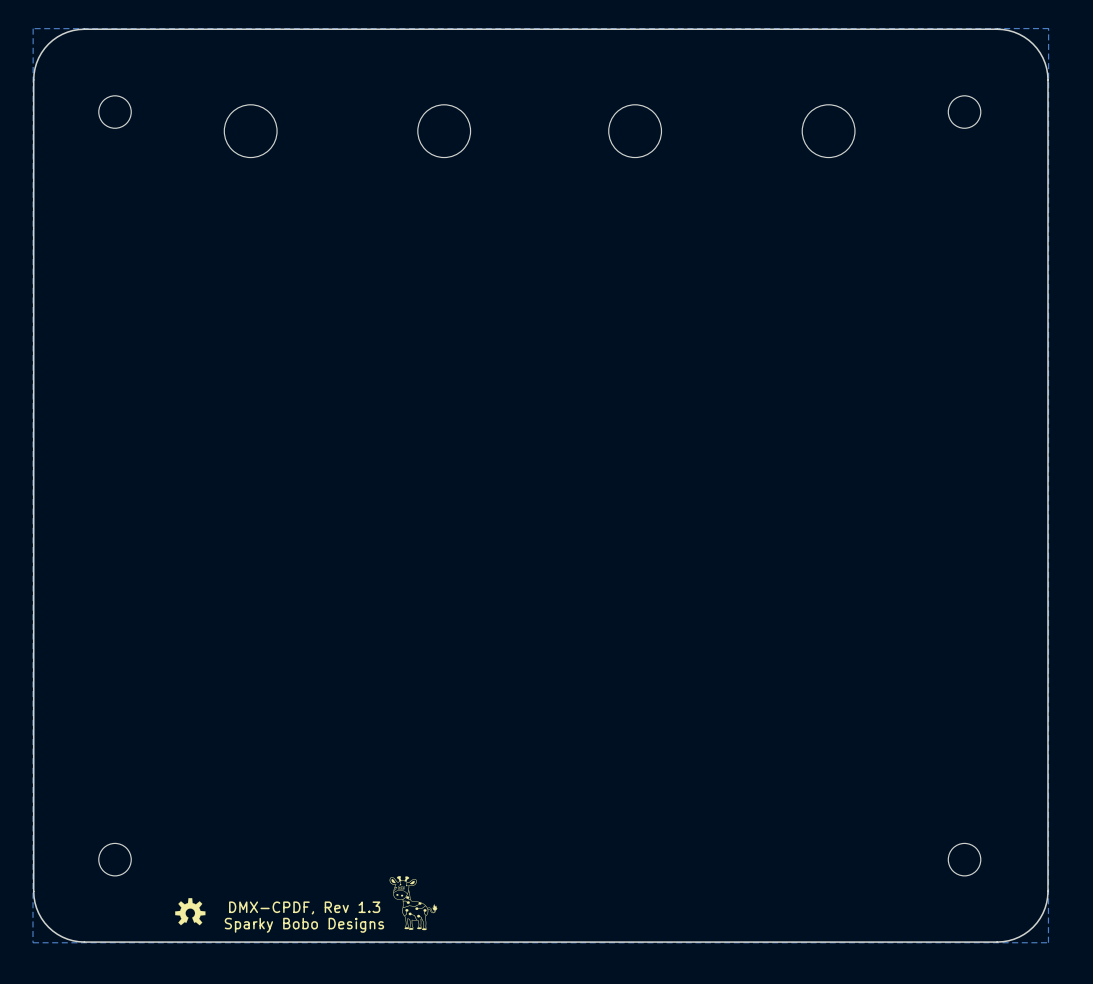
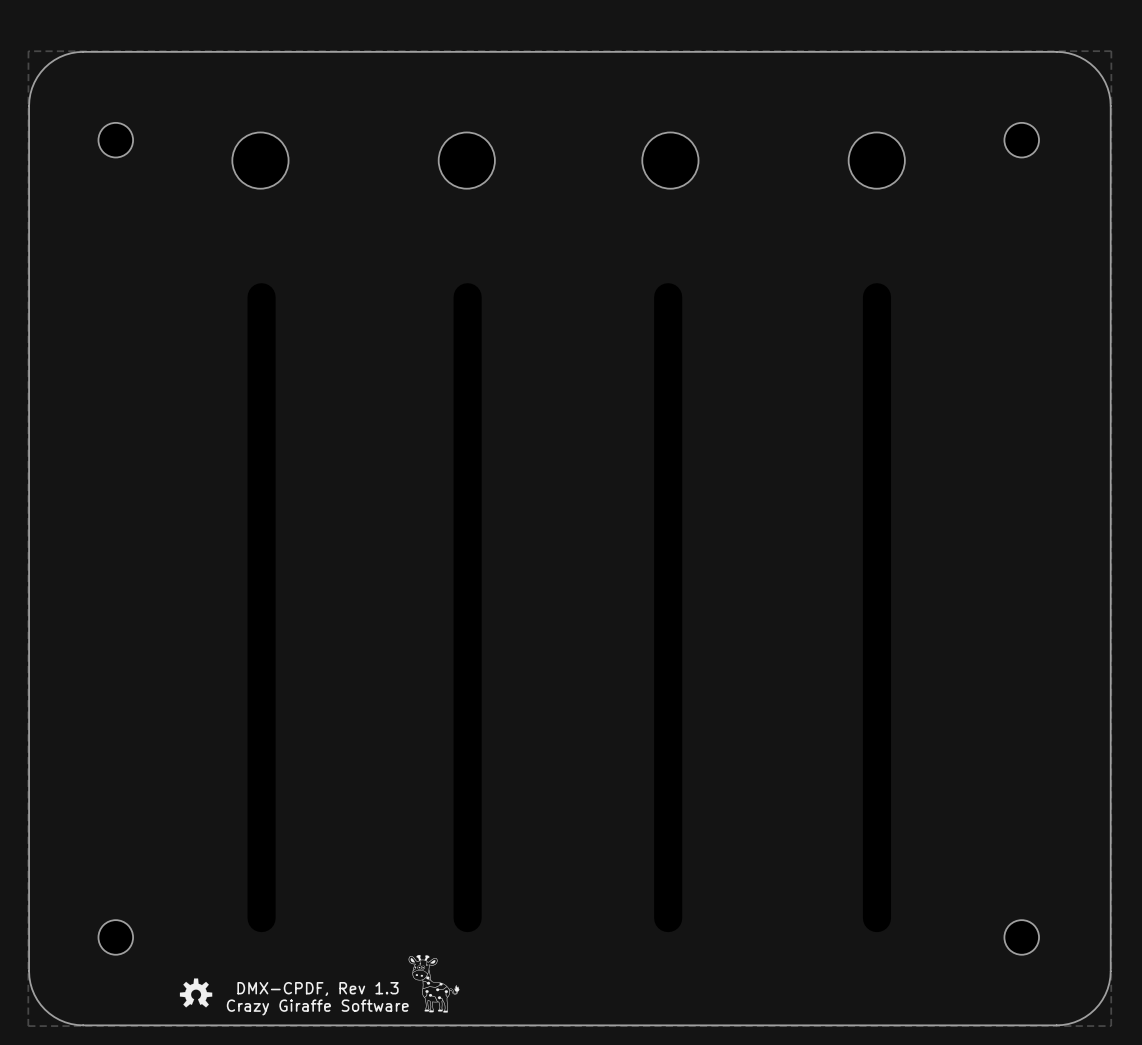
text: Sparky Bobo Designs (304, 925) -> Crazy Giraffe Software (317, 1007)

